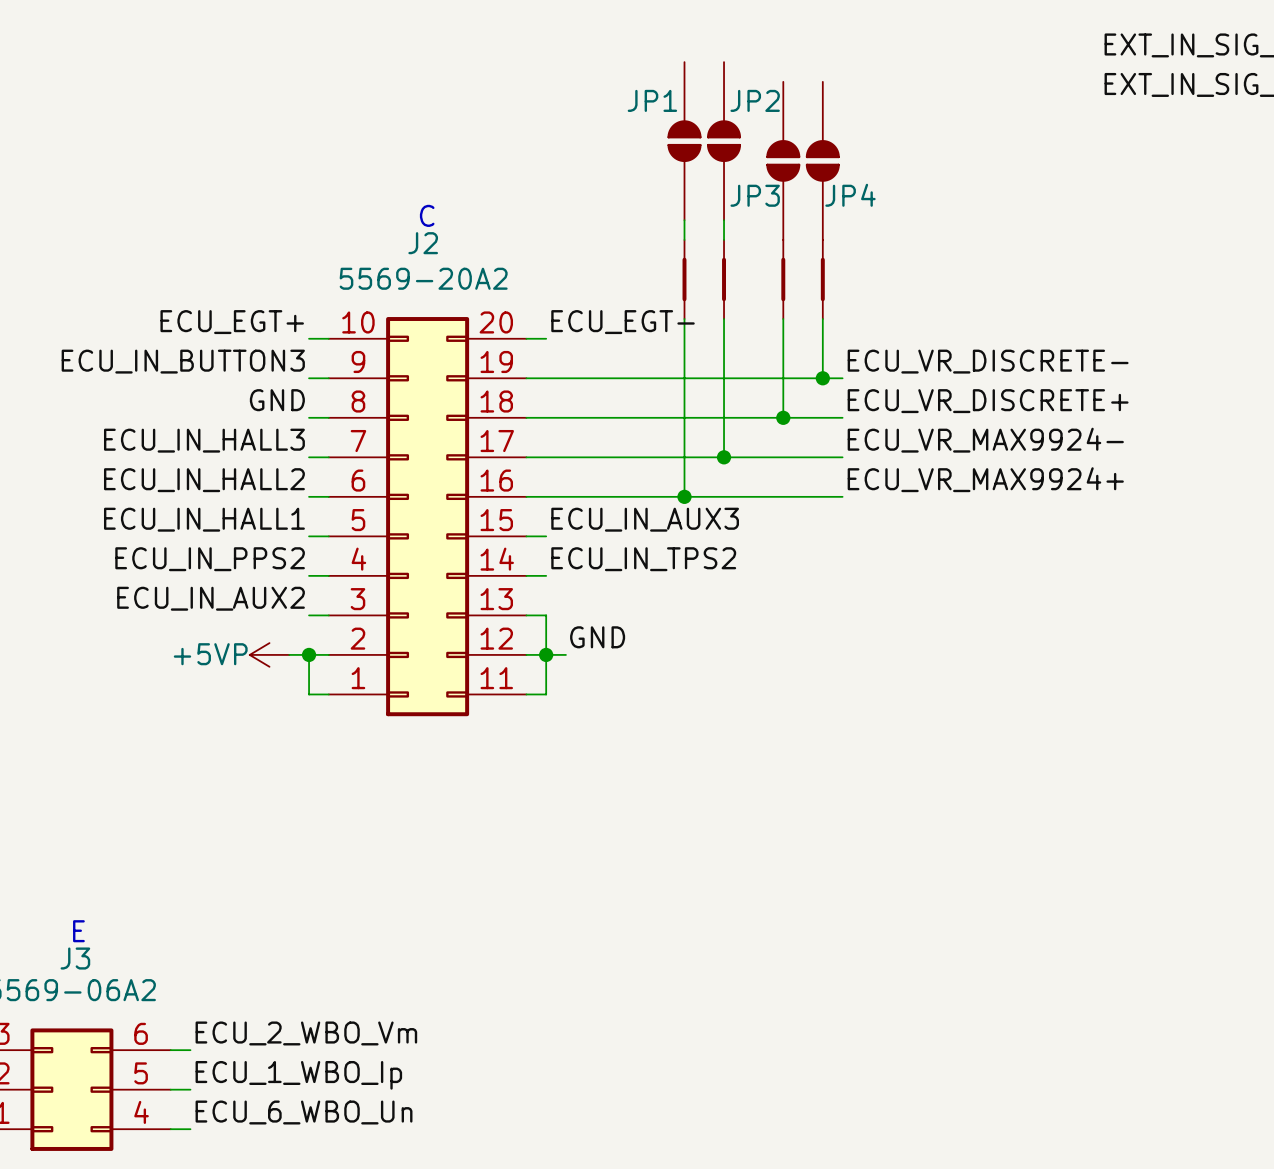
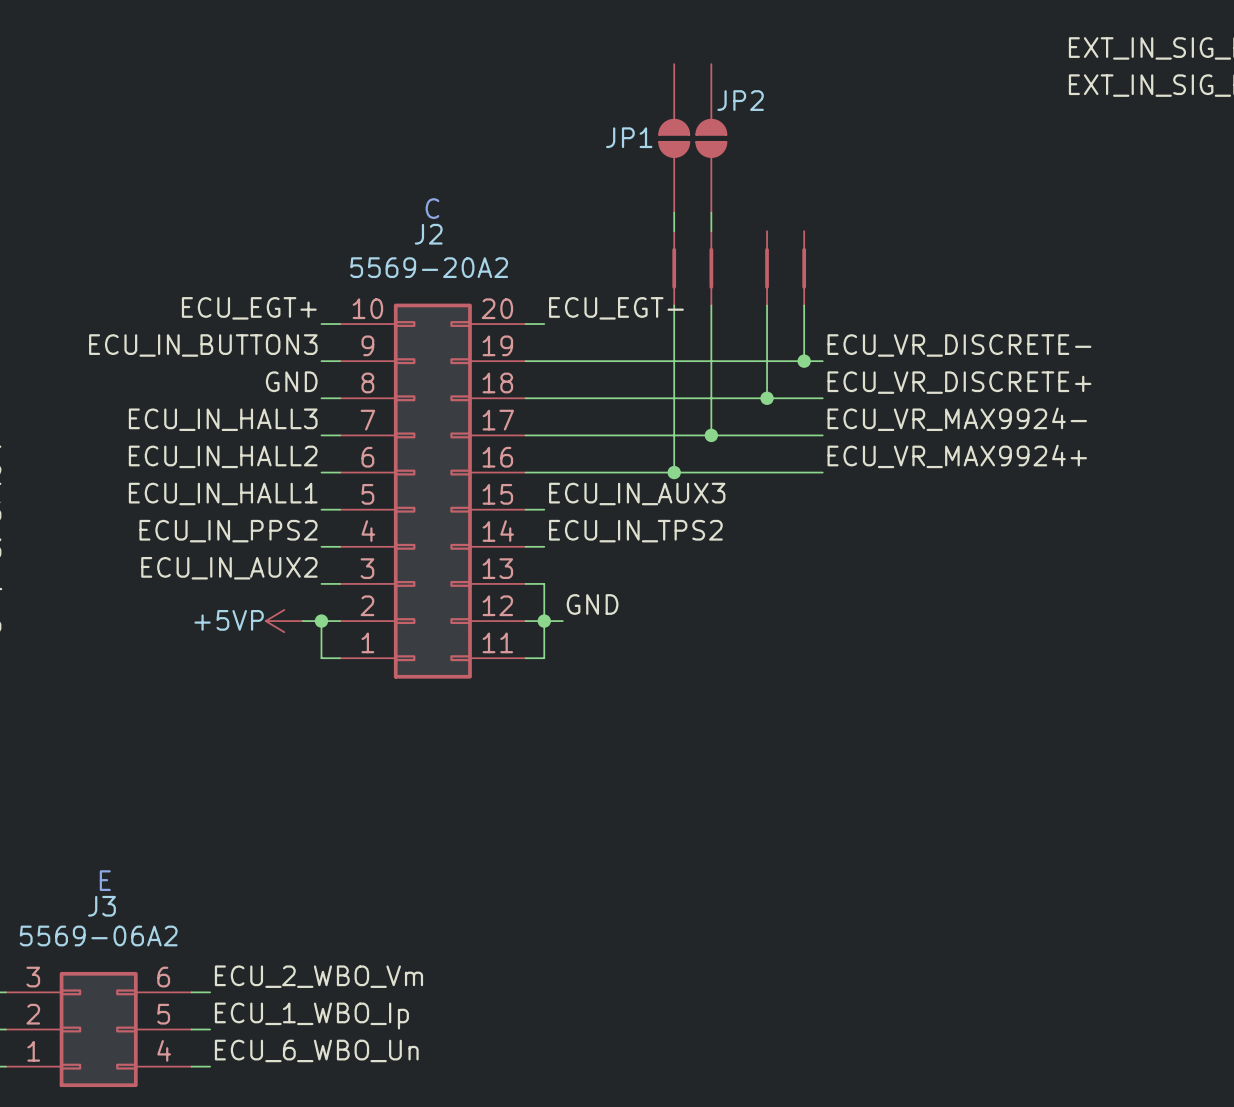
JP1 name position: JP1 (652, 100) -> JP1 (629, 137)
JP3: (783, 160) -> none
JP4: (822, 160) -> none

